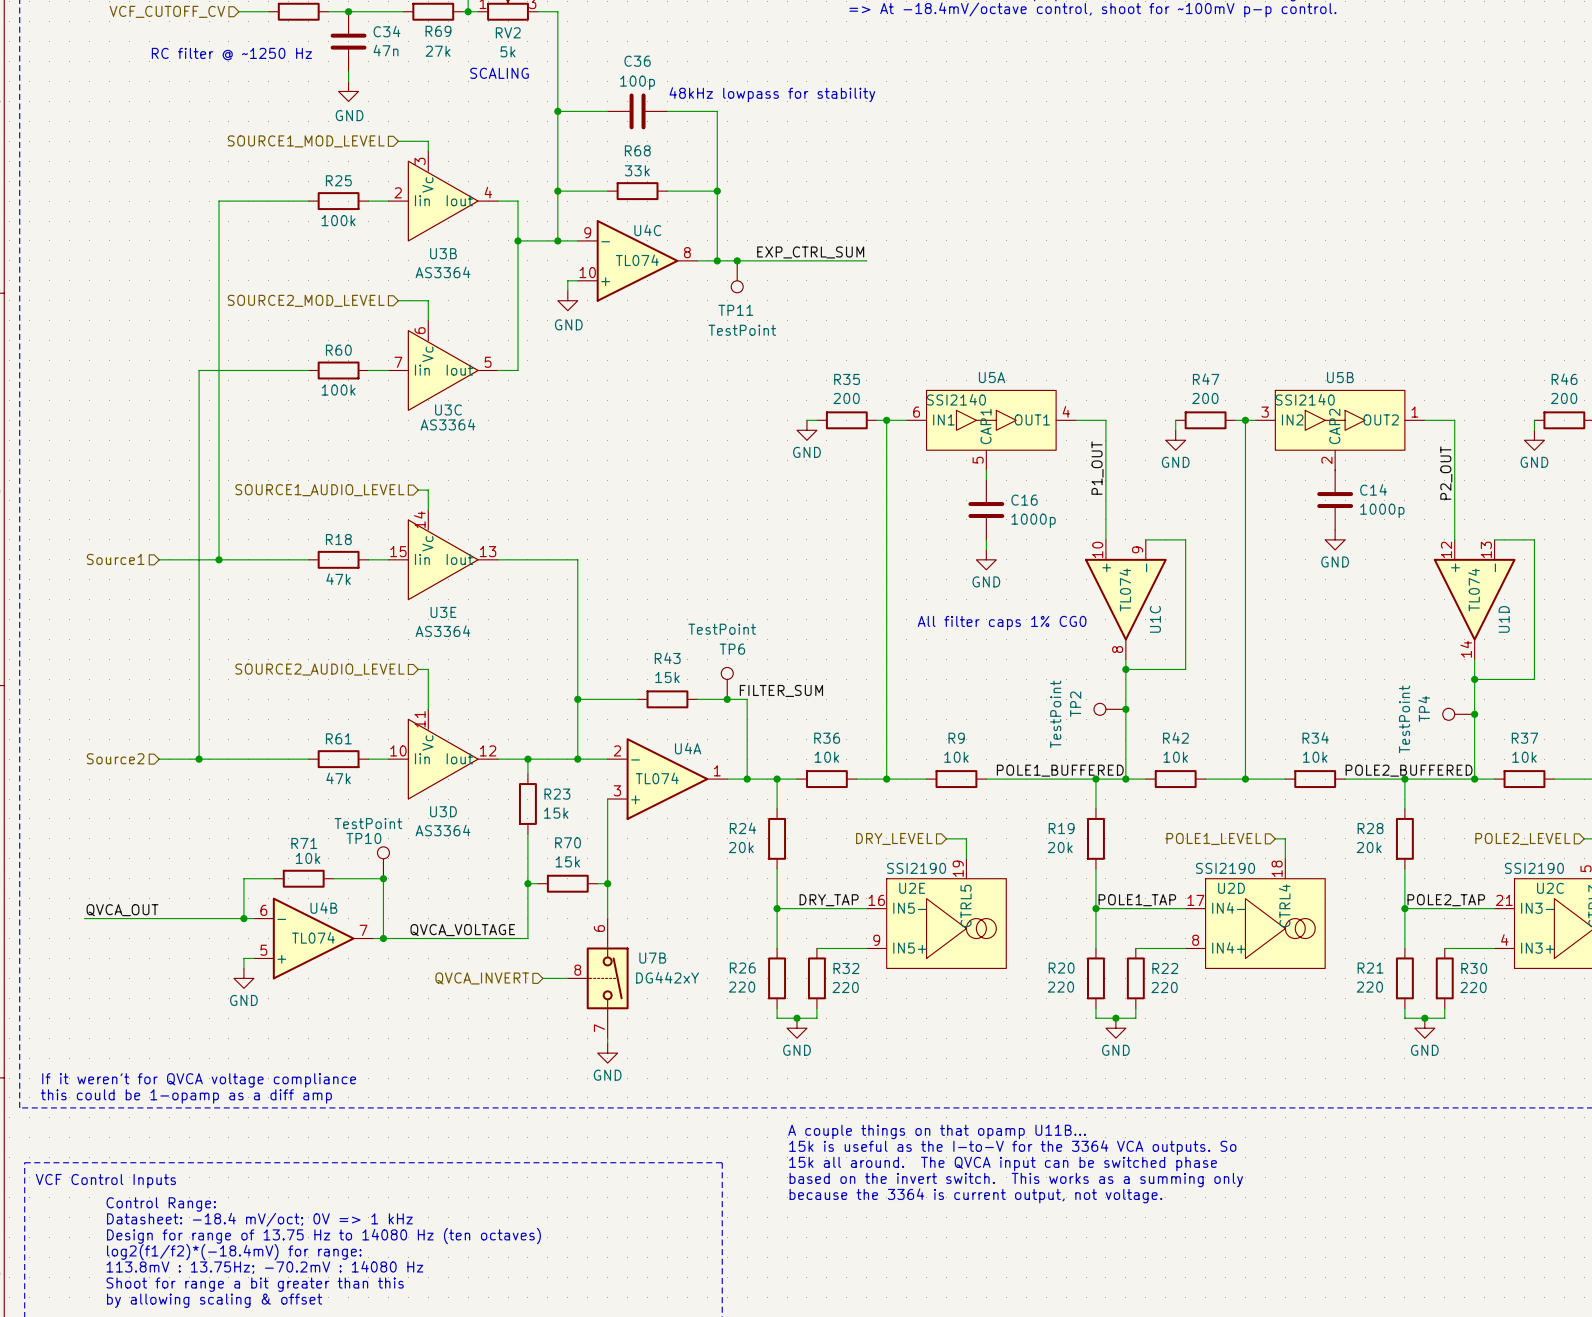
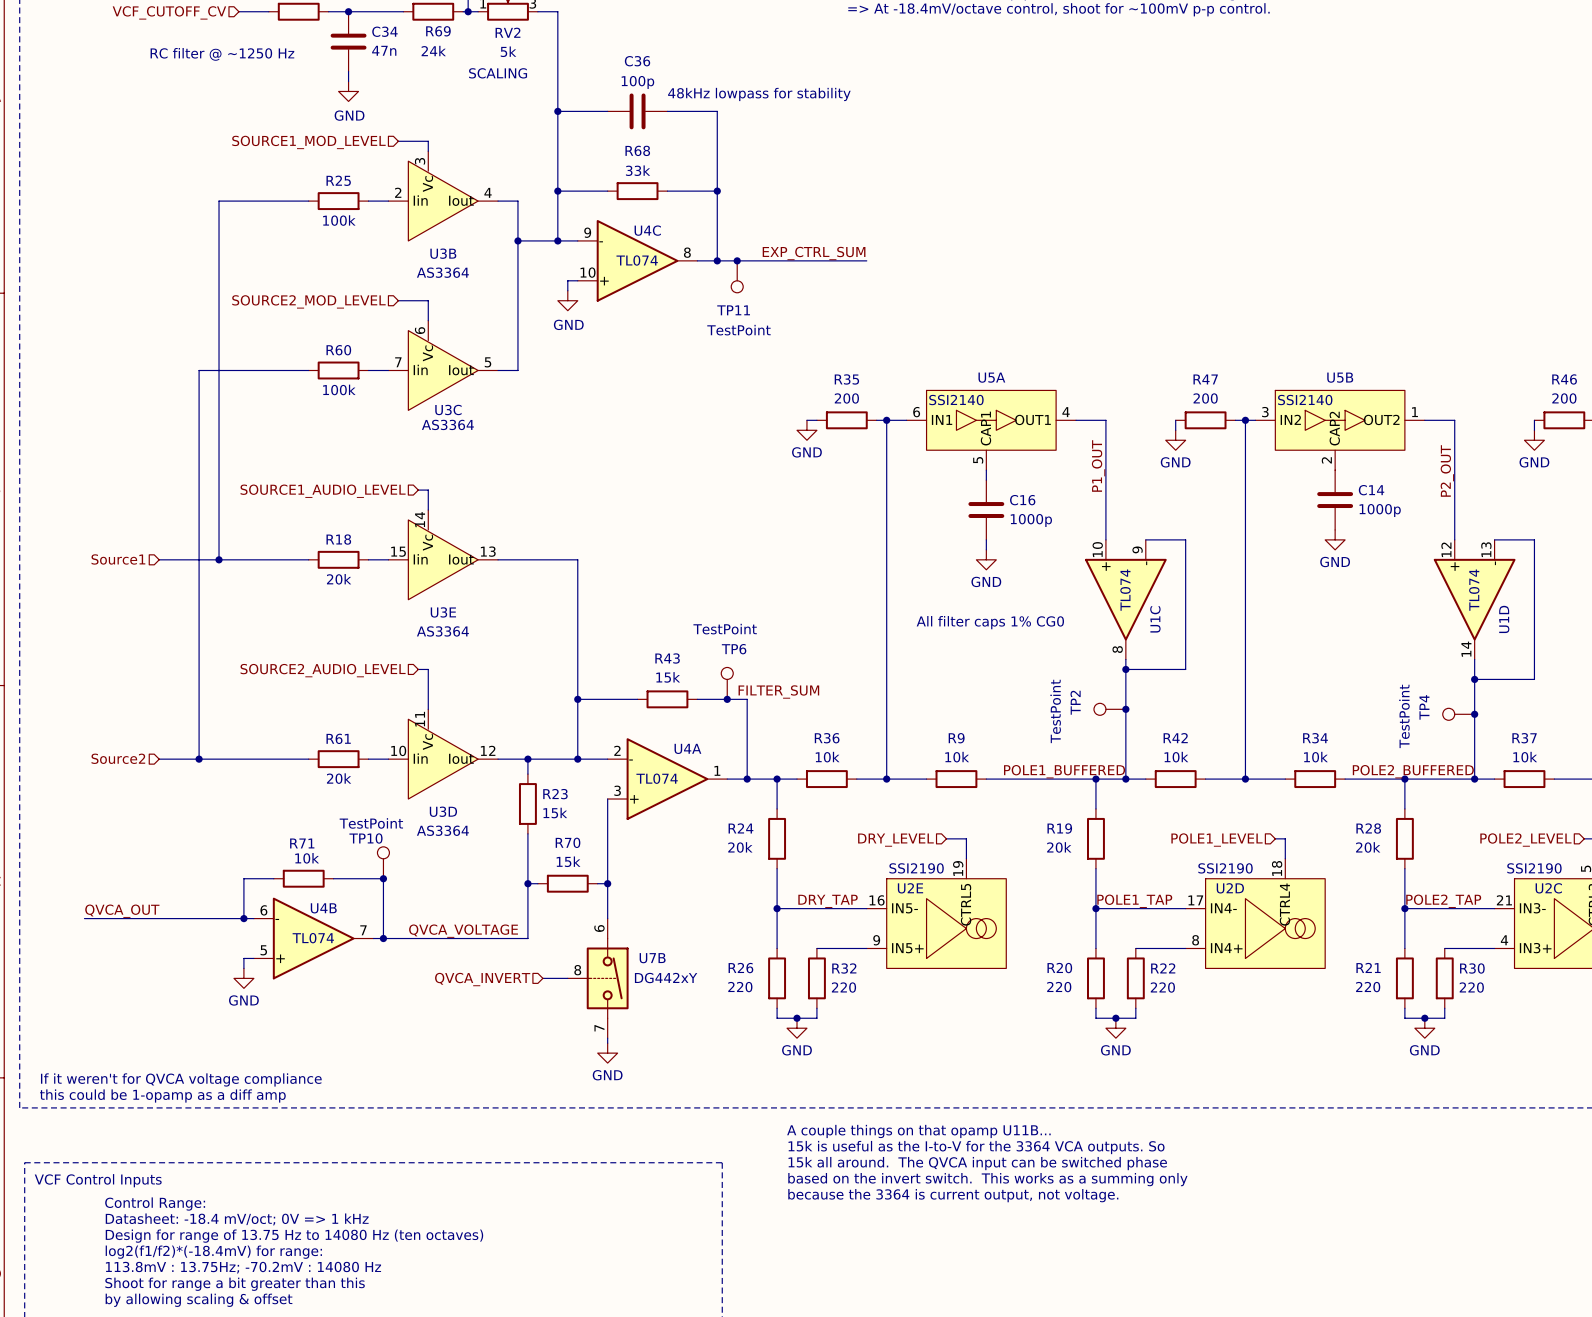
R69 value: 27k (438, 51) -> 24k (433, 51)
R18 value: 47k (338, 579) -> 20k (339, 579)
R61 value: 47k (338, 778) -> 20k (339, 778)

